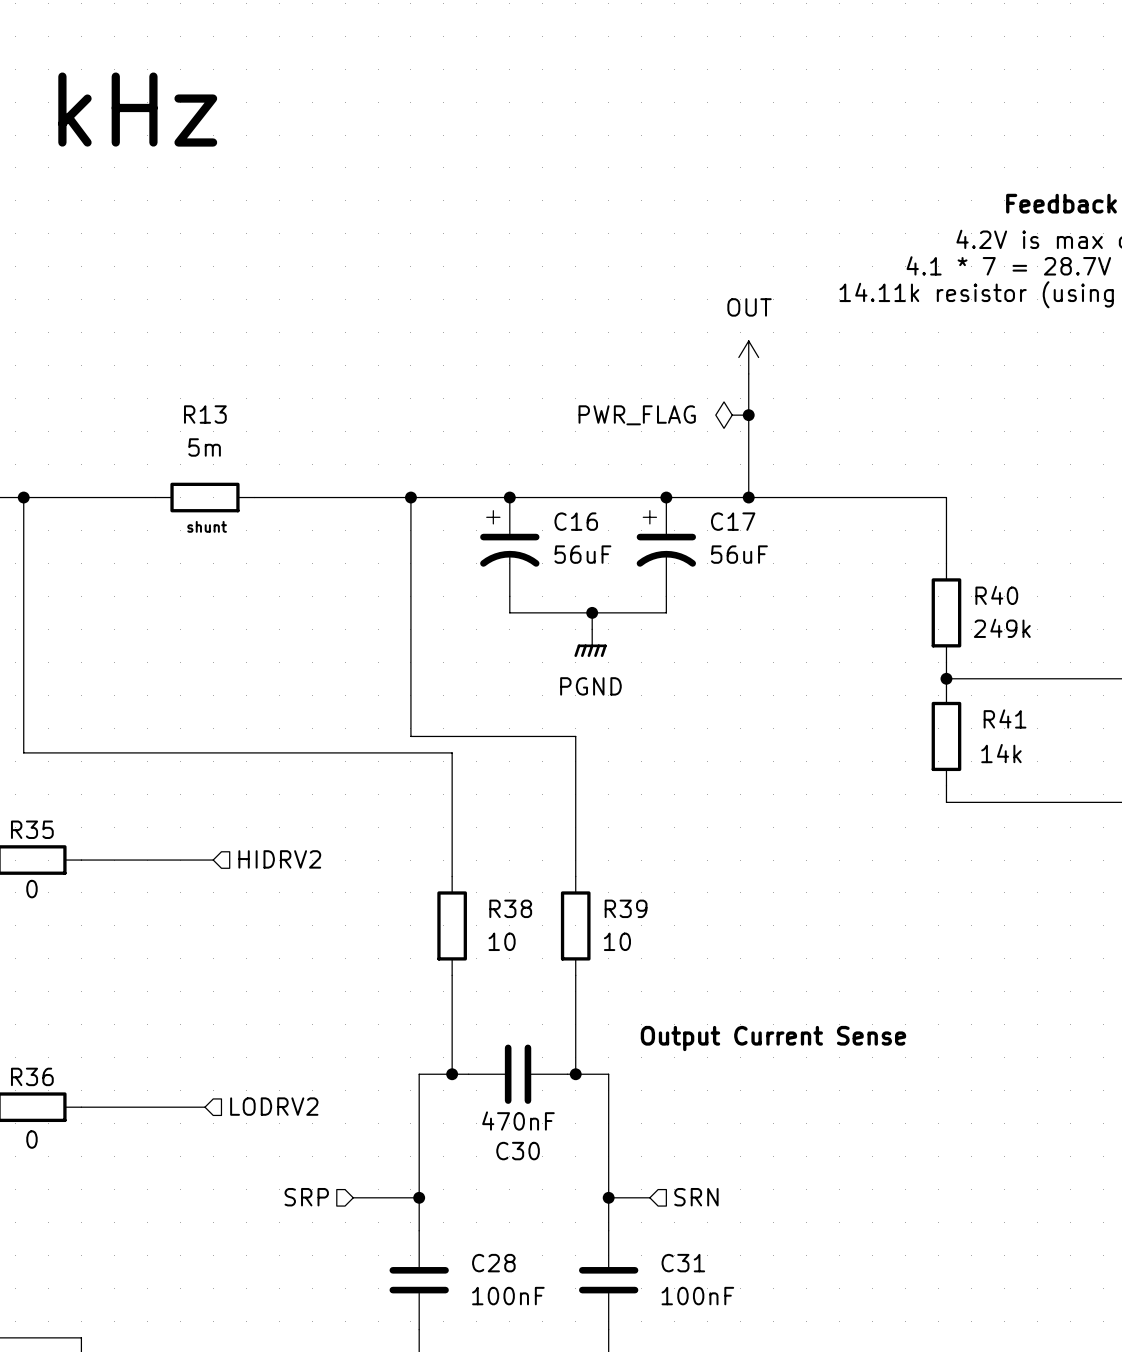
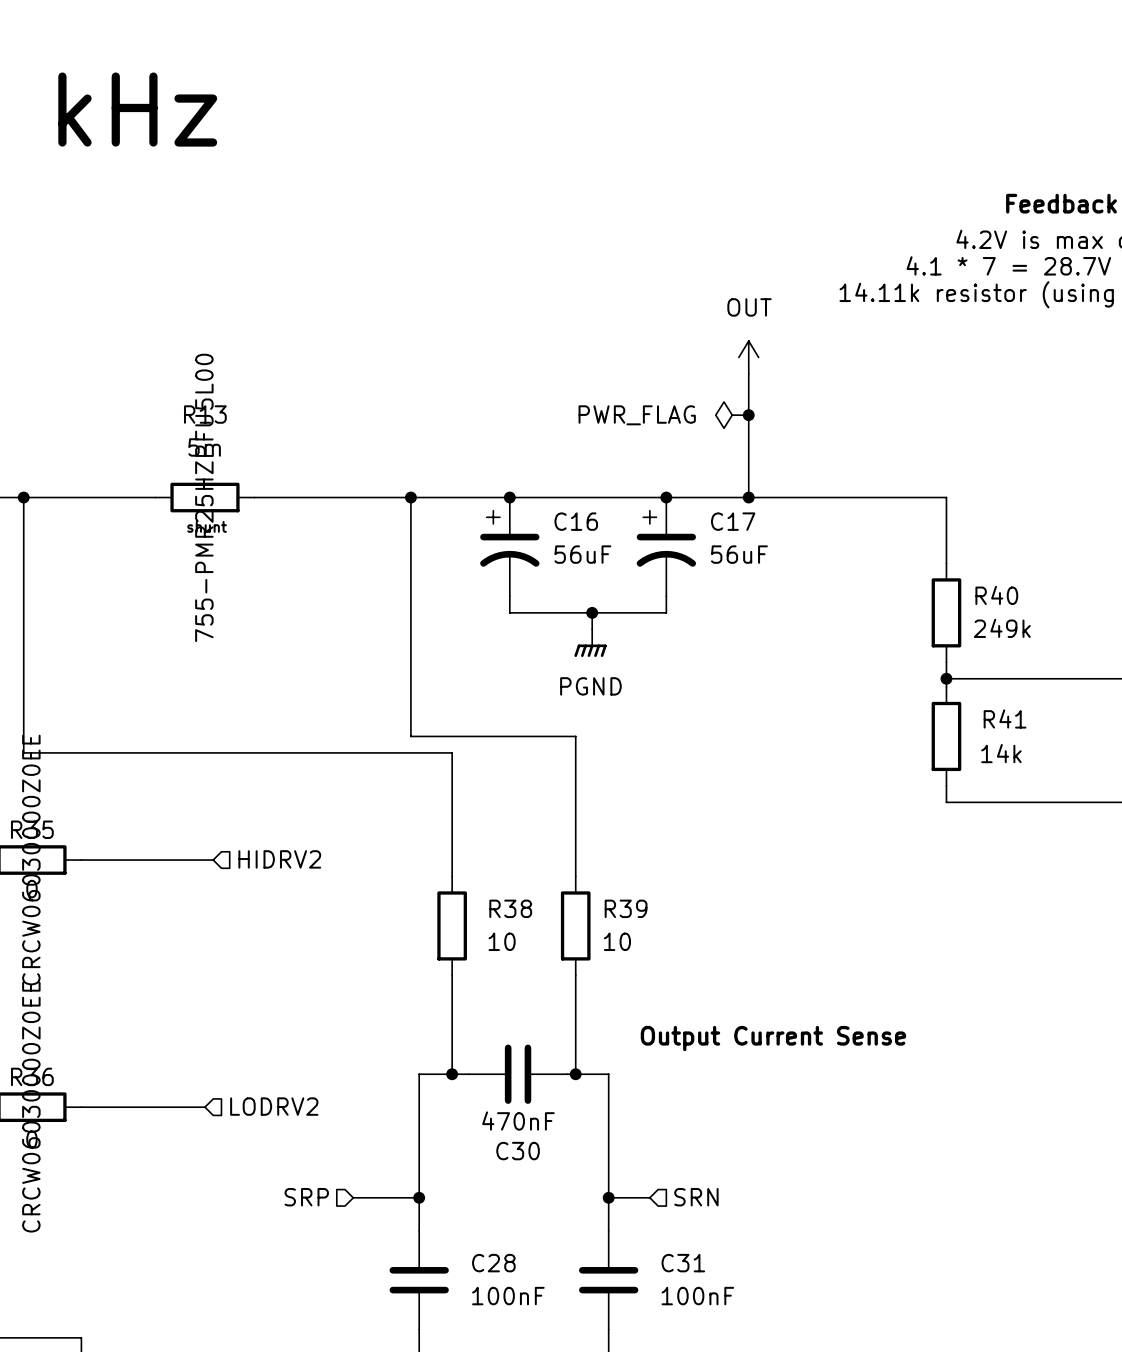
R13 text: none -> 755-PMR25HZPFU5L00 (204, 497)
R35 text: none -> CRCW06030000Z0EE (31, 860)
R36 text: none -> CRCW06030000Z0EE (31, 1107)

